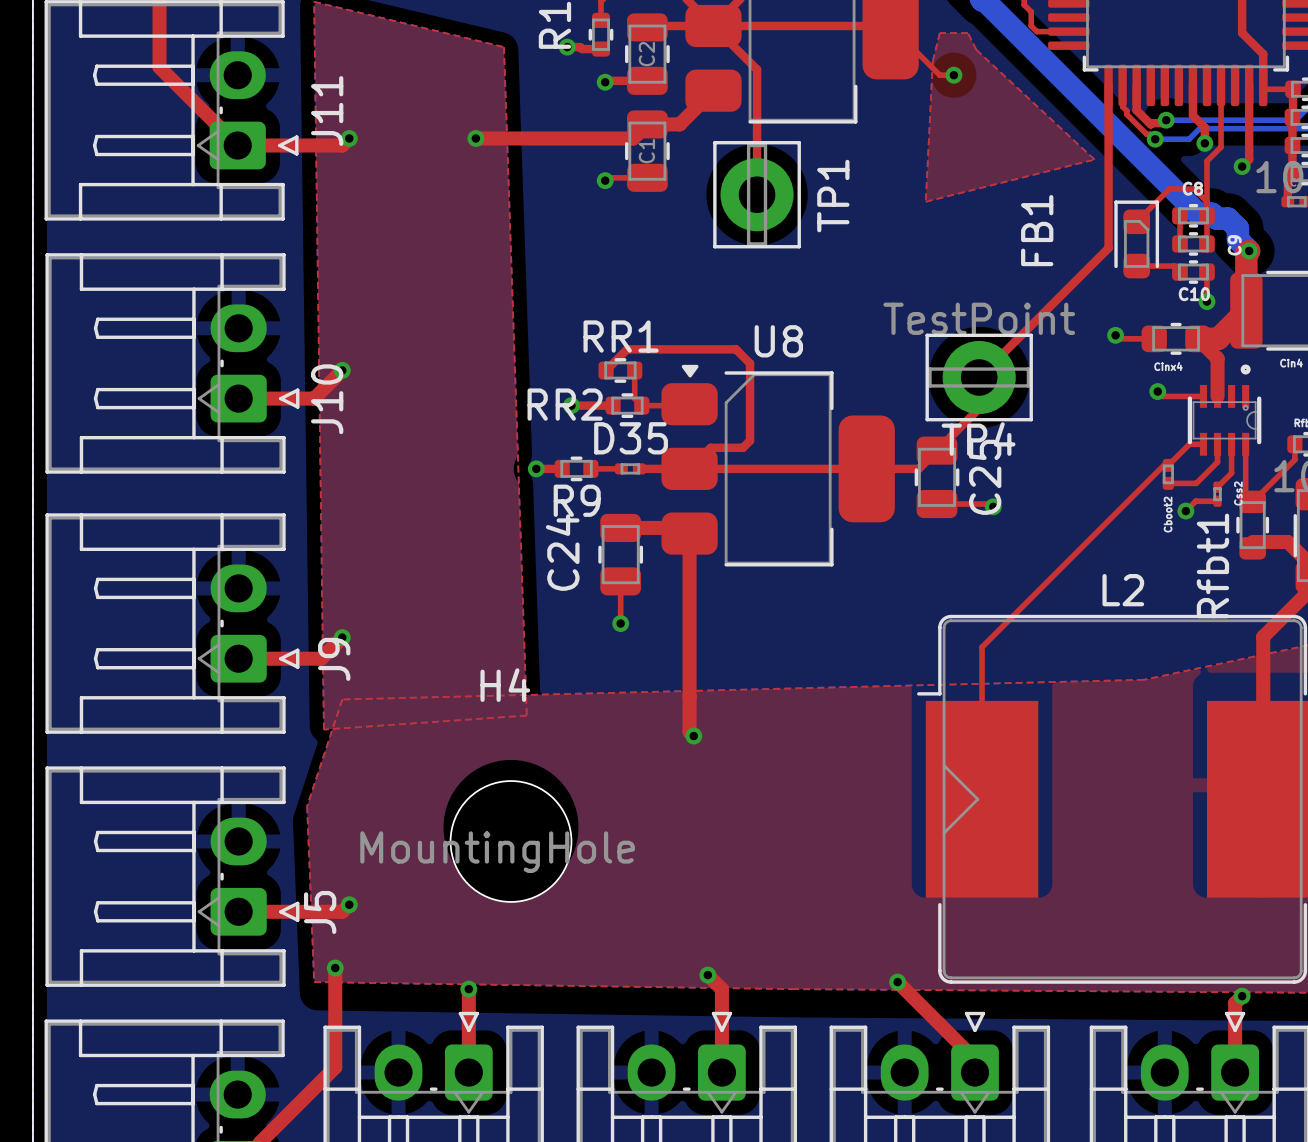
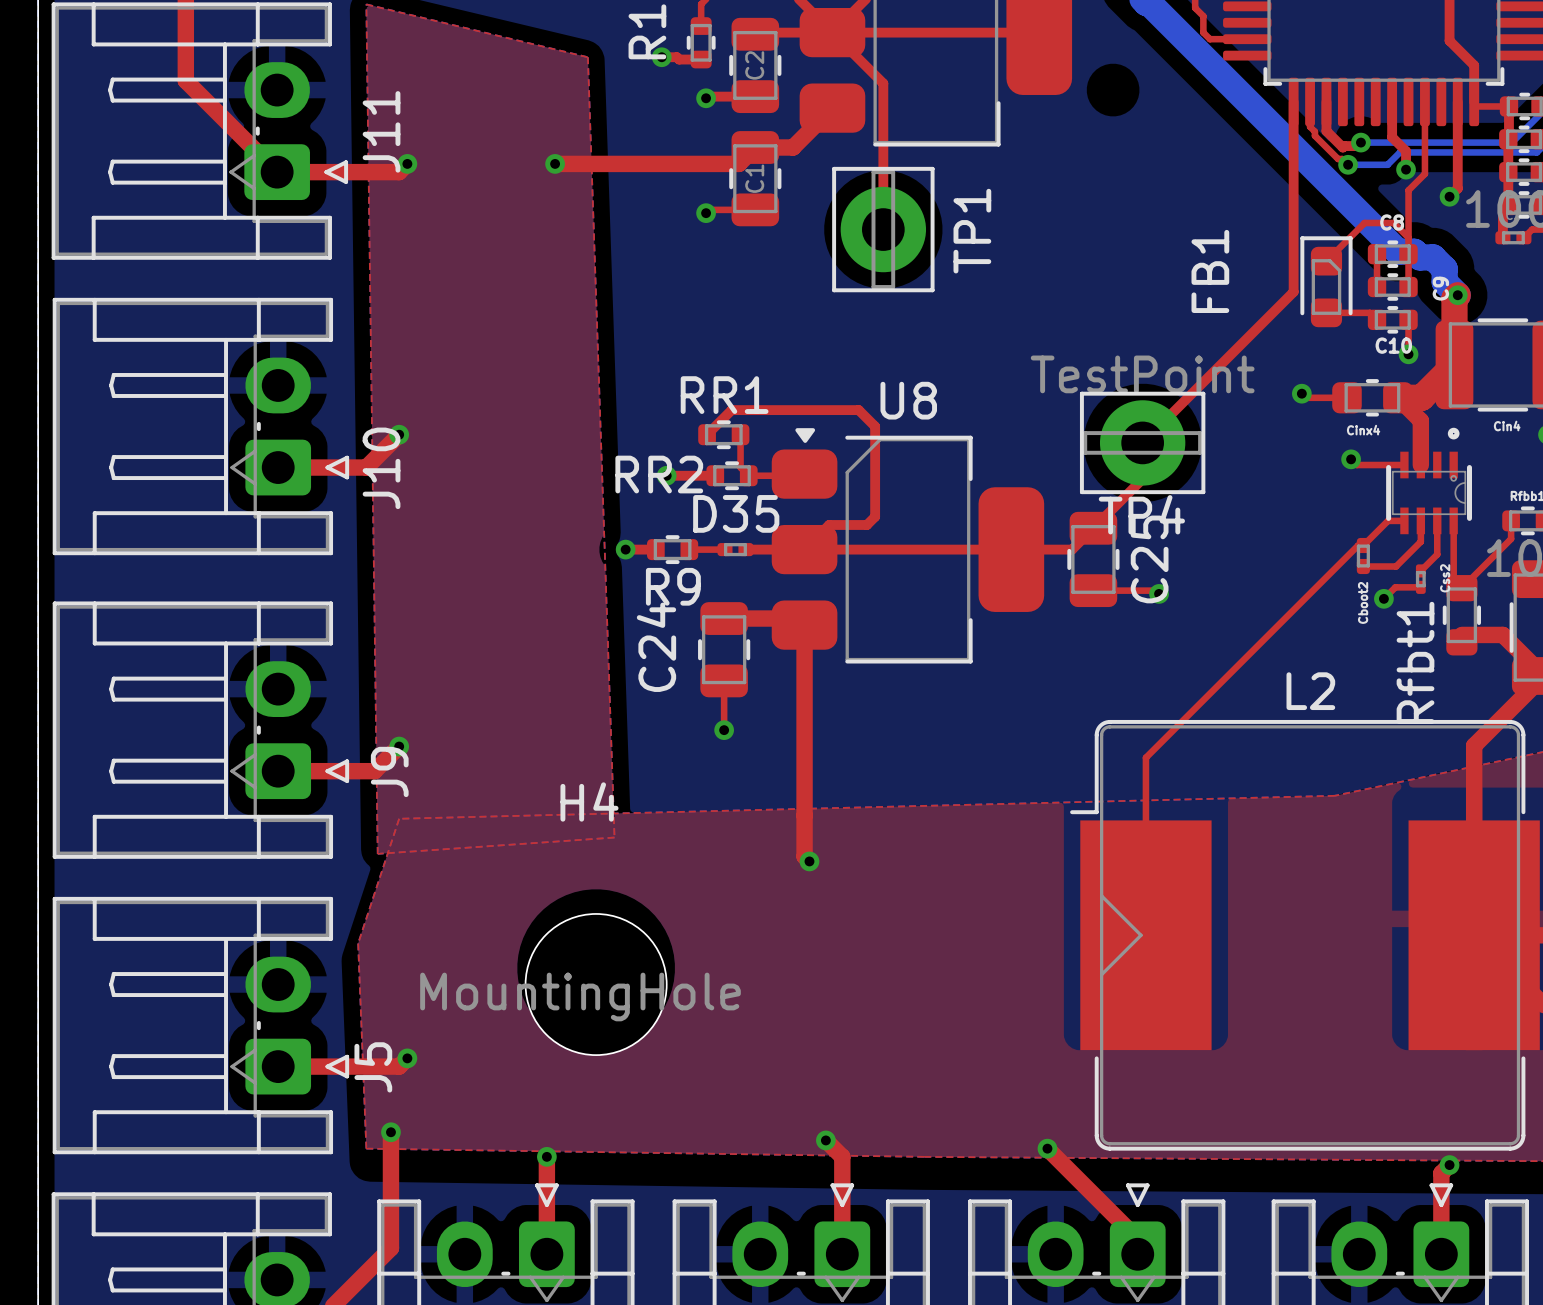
top track: (890, 25) (939, 75) (953, 75) -> none
top zone outline: (939, 33) (967, 33) (976, 49) (1094, 159) (925, 201) (932, 61) (939, 33) -> none
via: (953, 75) -> none

